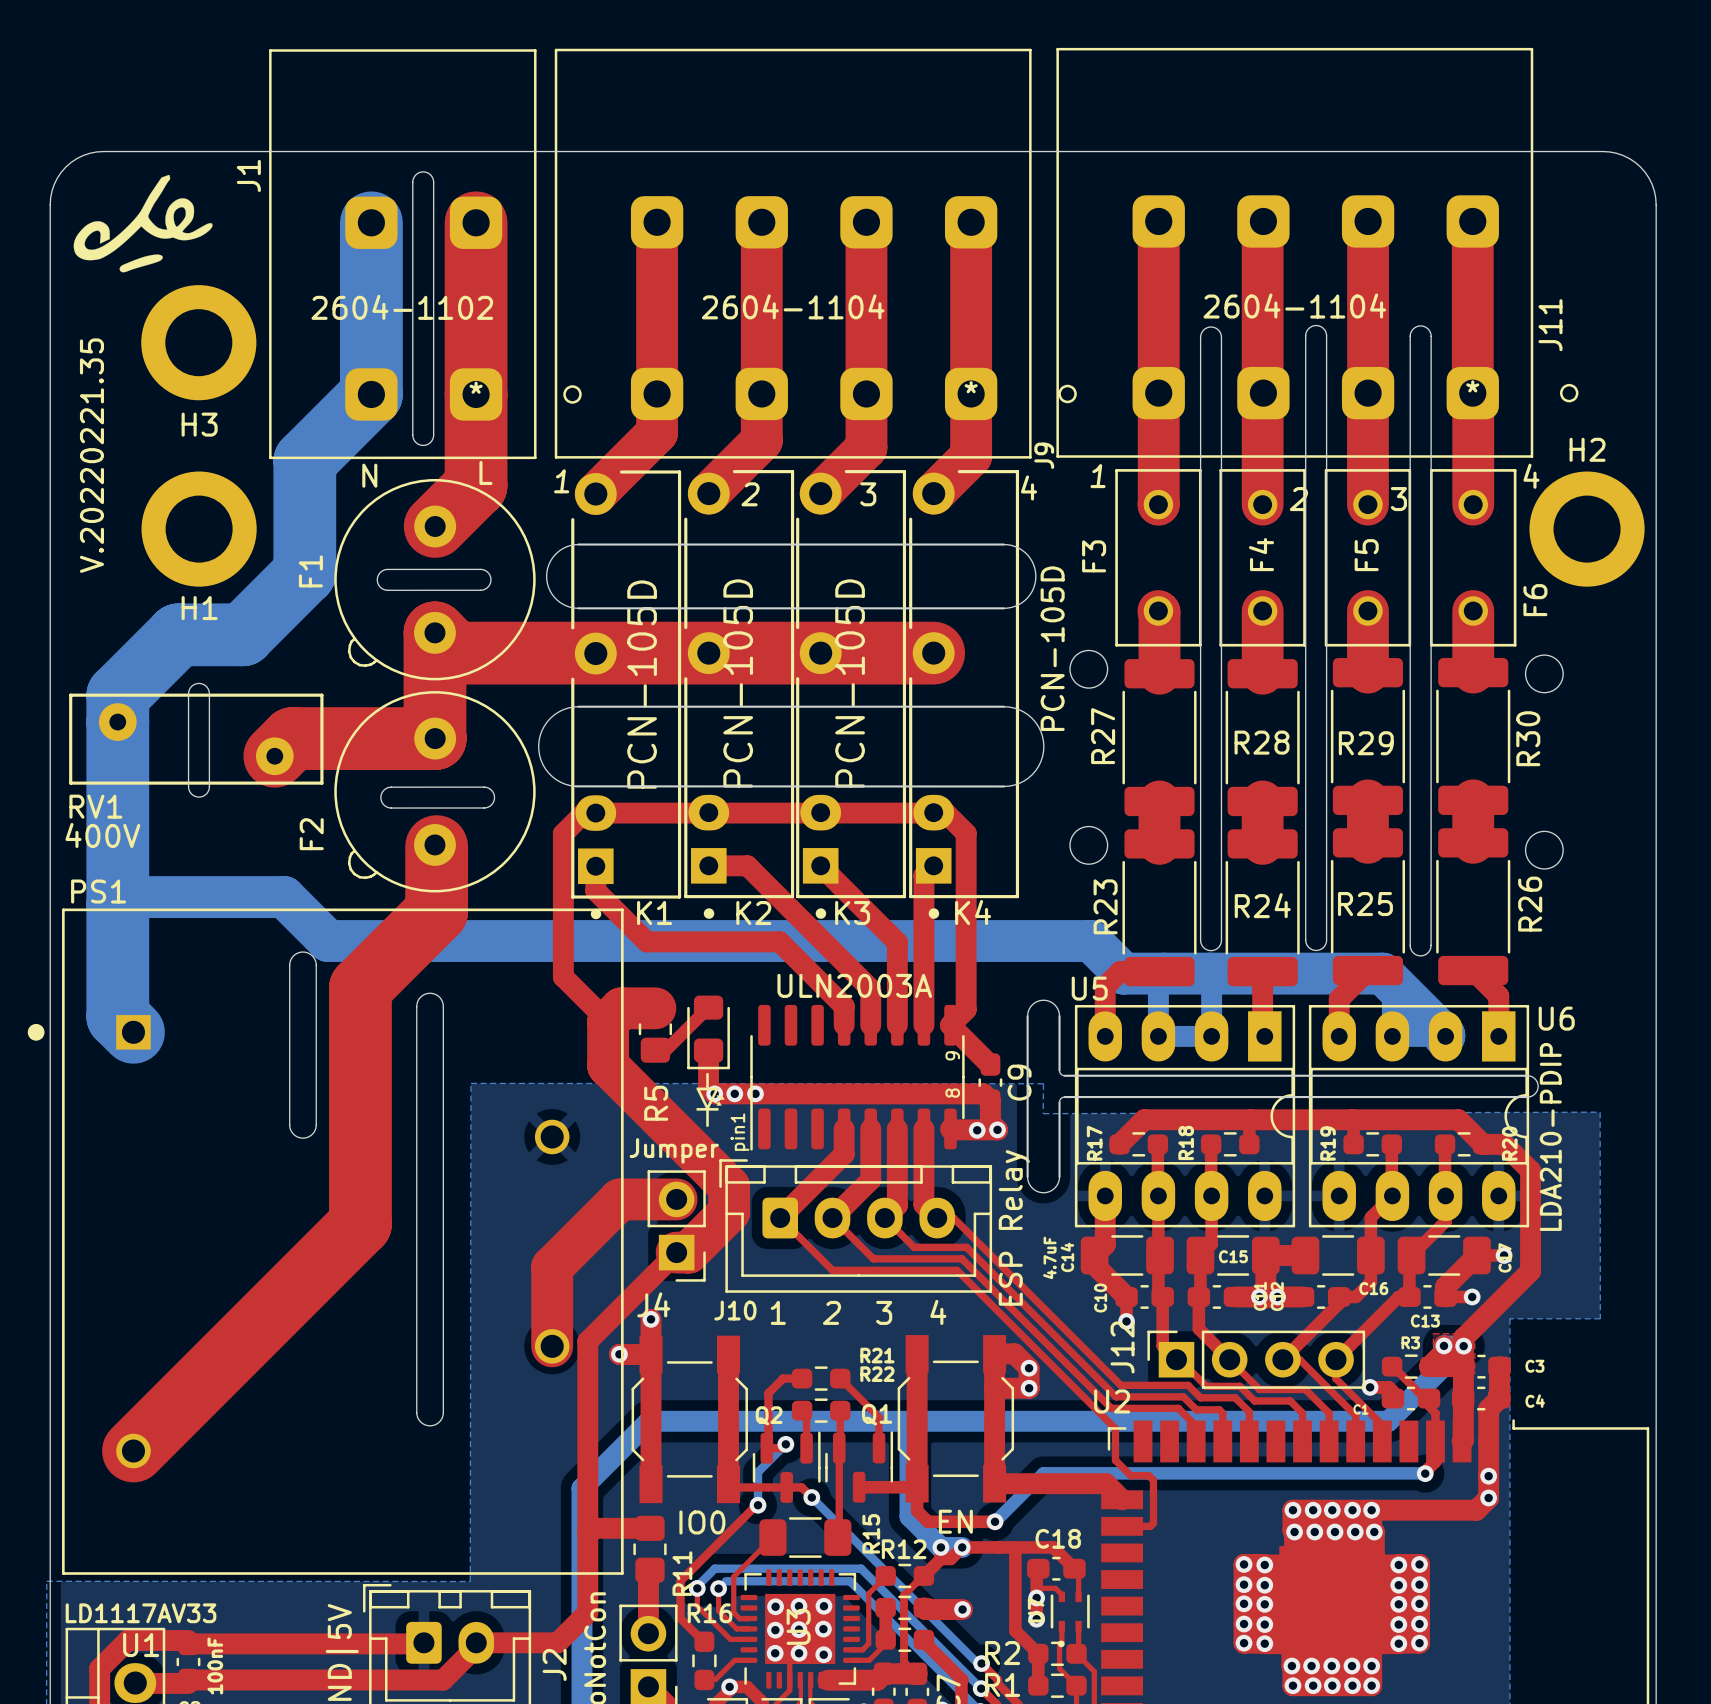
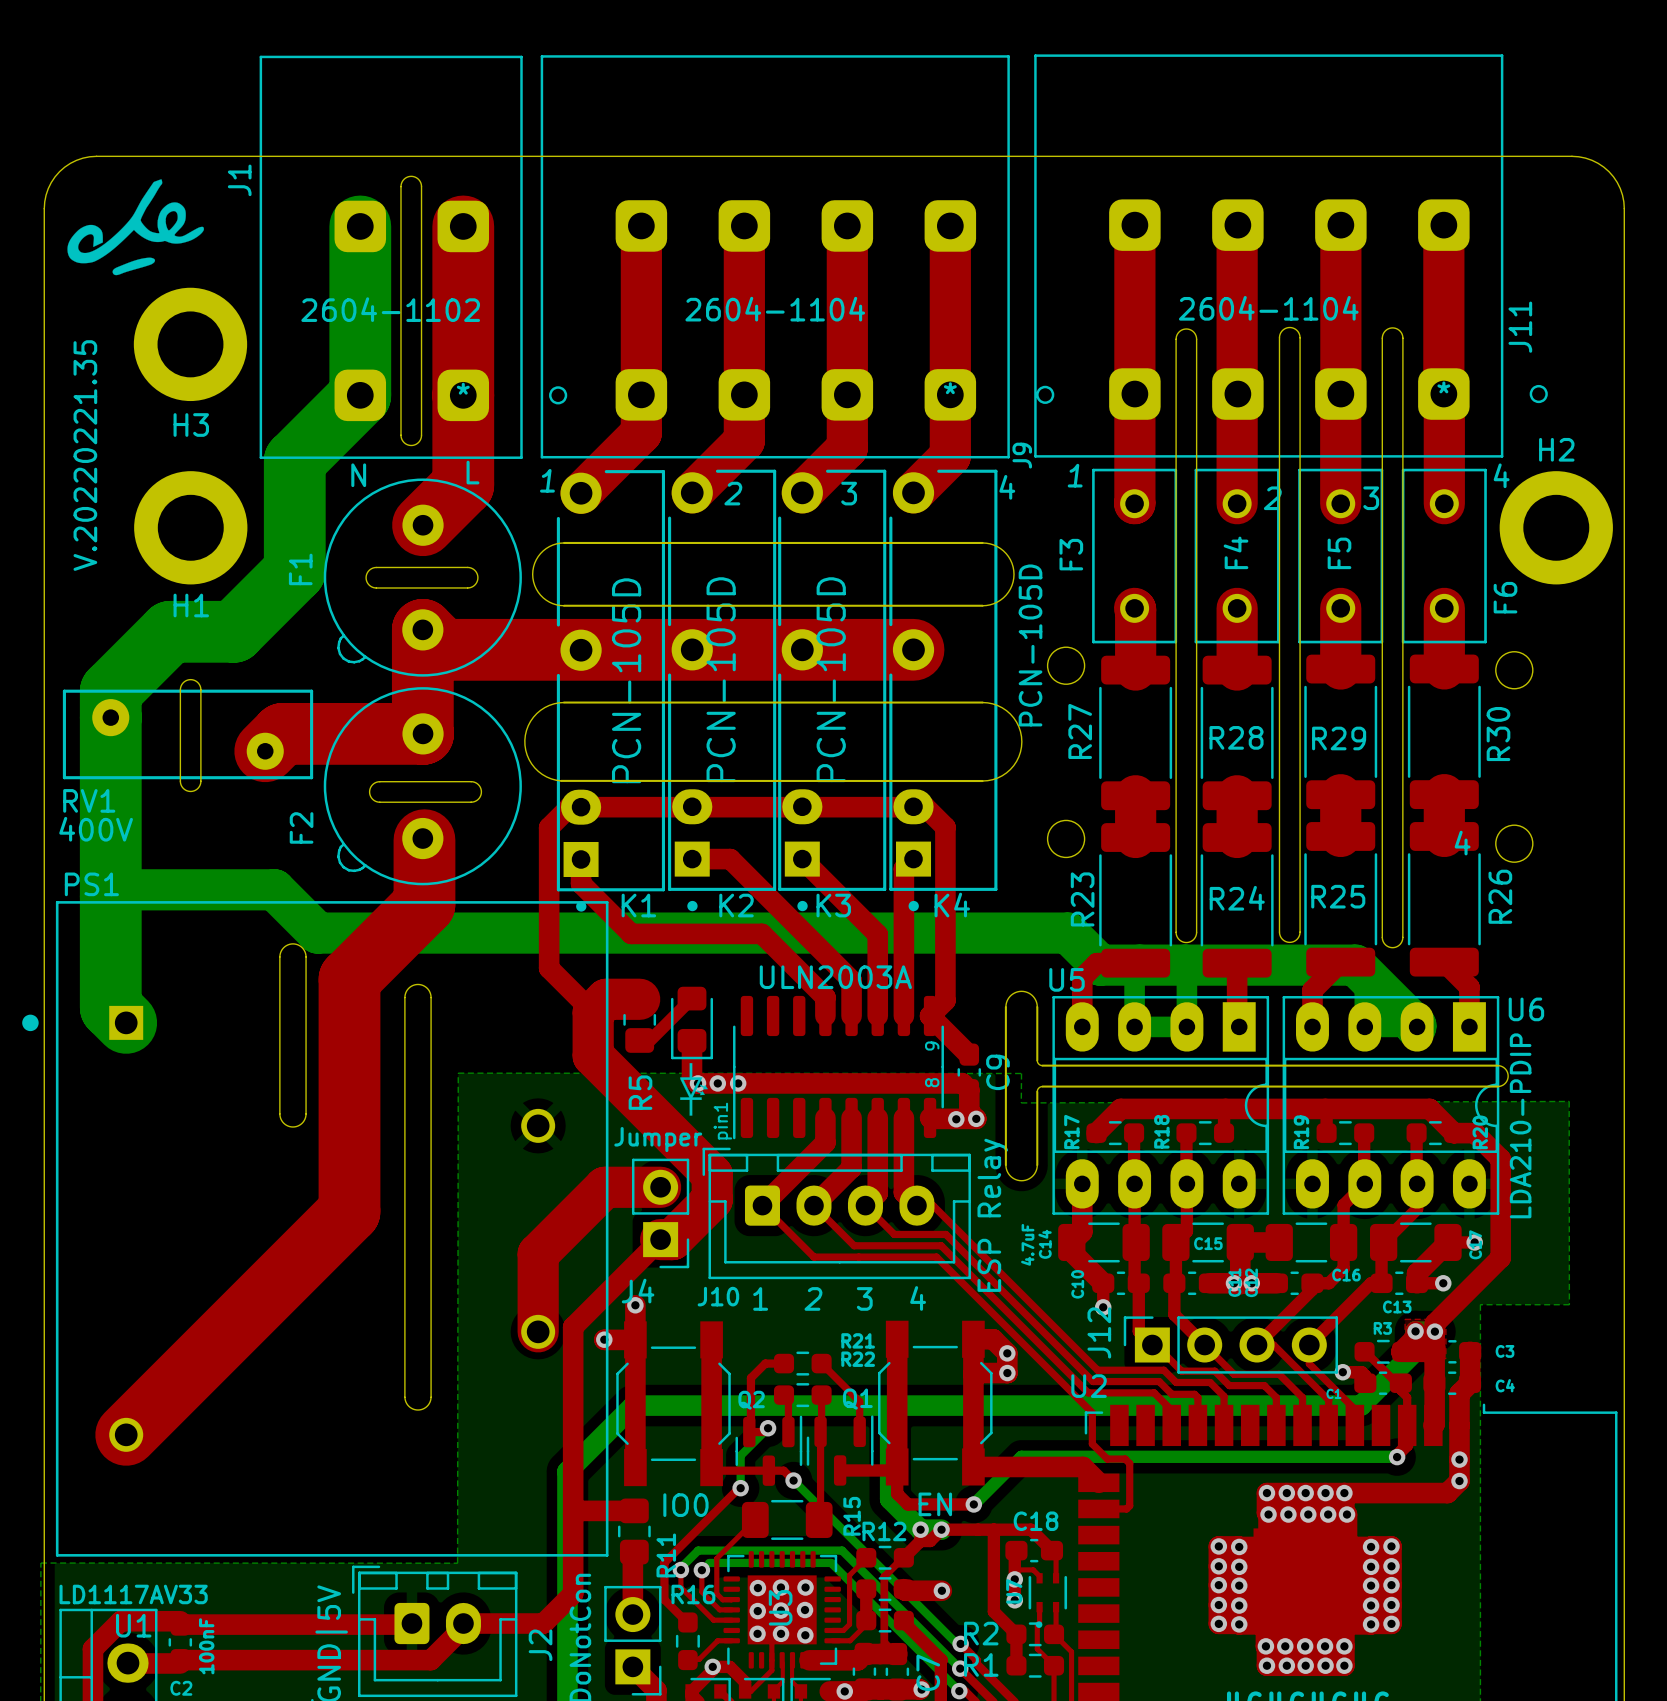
text: none -> 4 (1462, 843)

